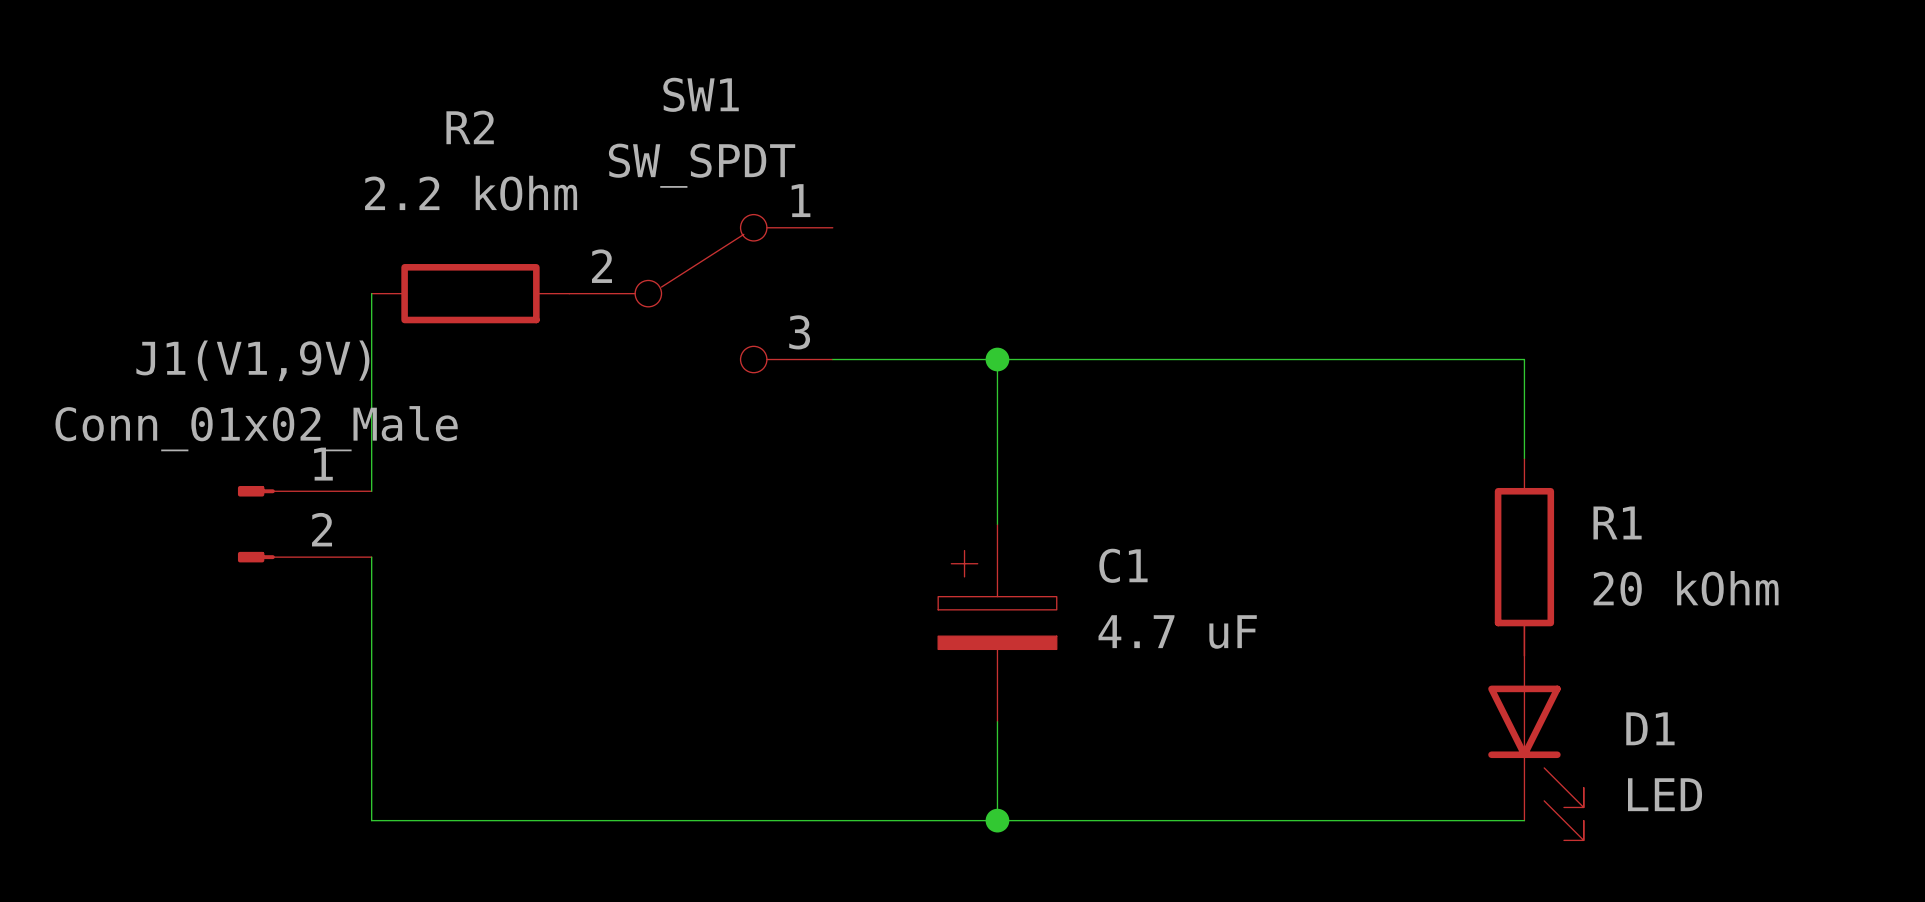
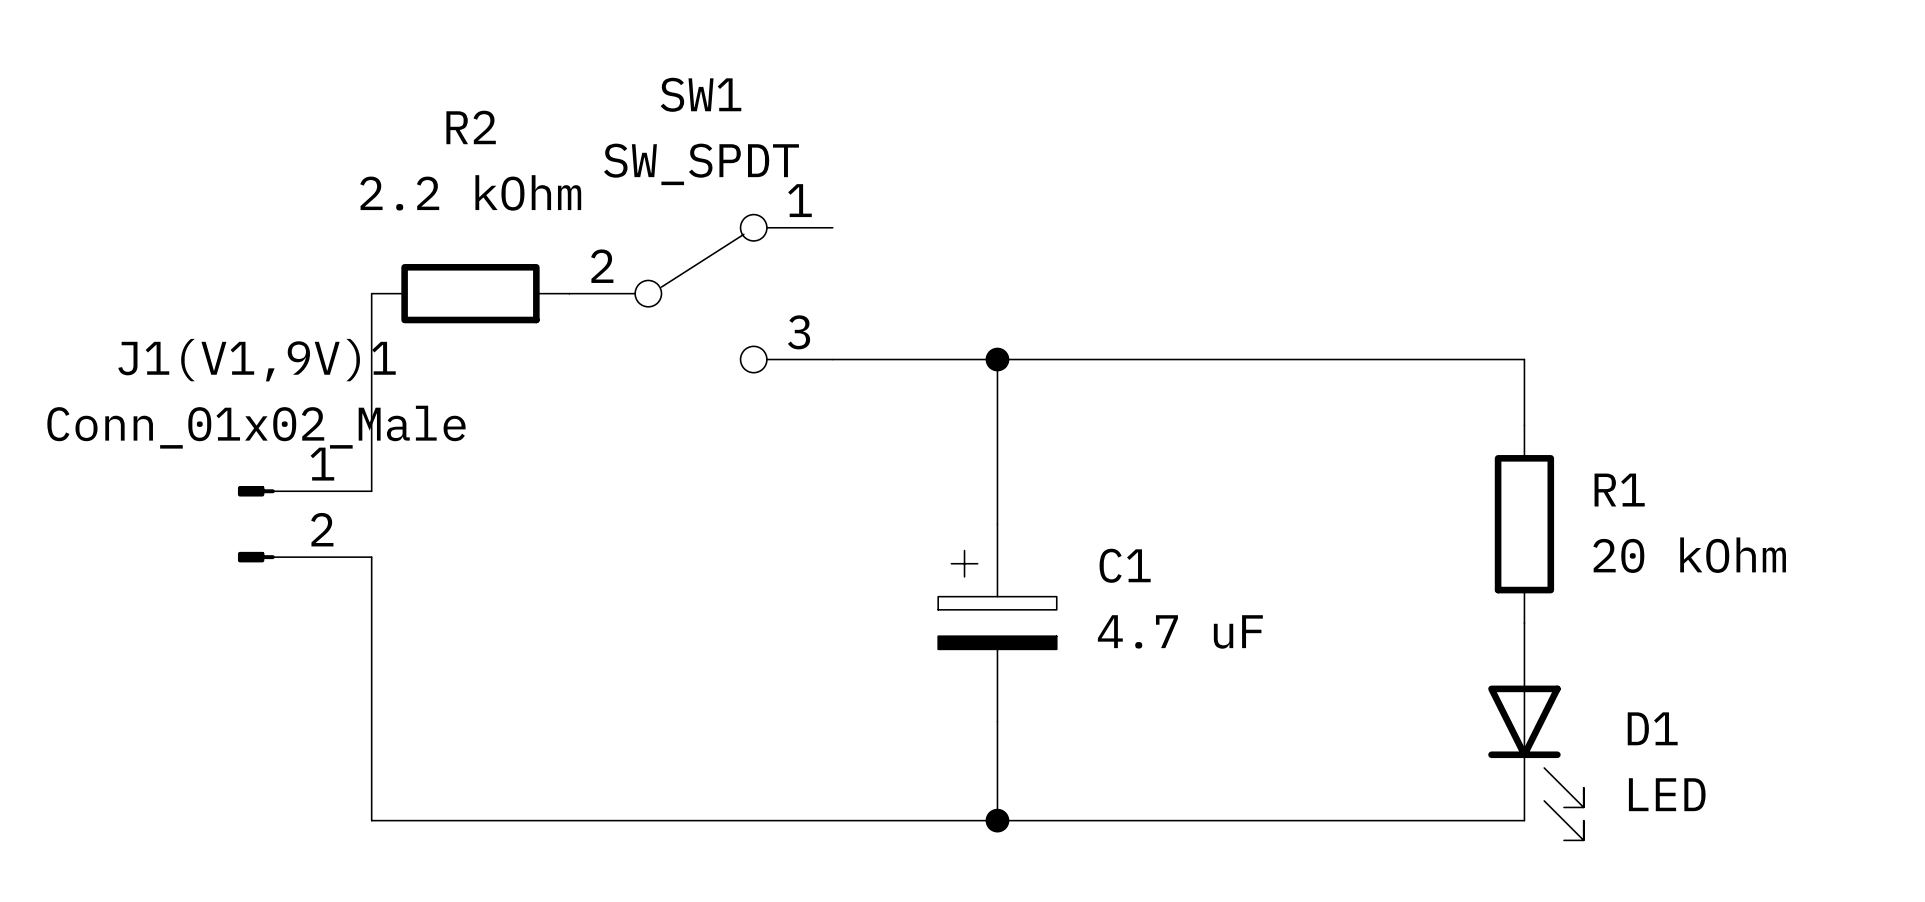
J1(V1,9V) name: J1(V1,9V) (252, 360) -> J1(V1,9V)1 (257, 360)
R1 position: (1524, 557) -> (1524, 524)

